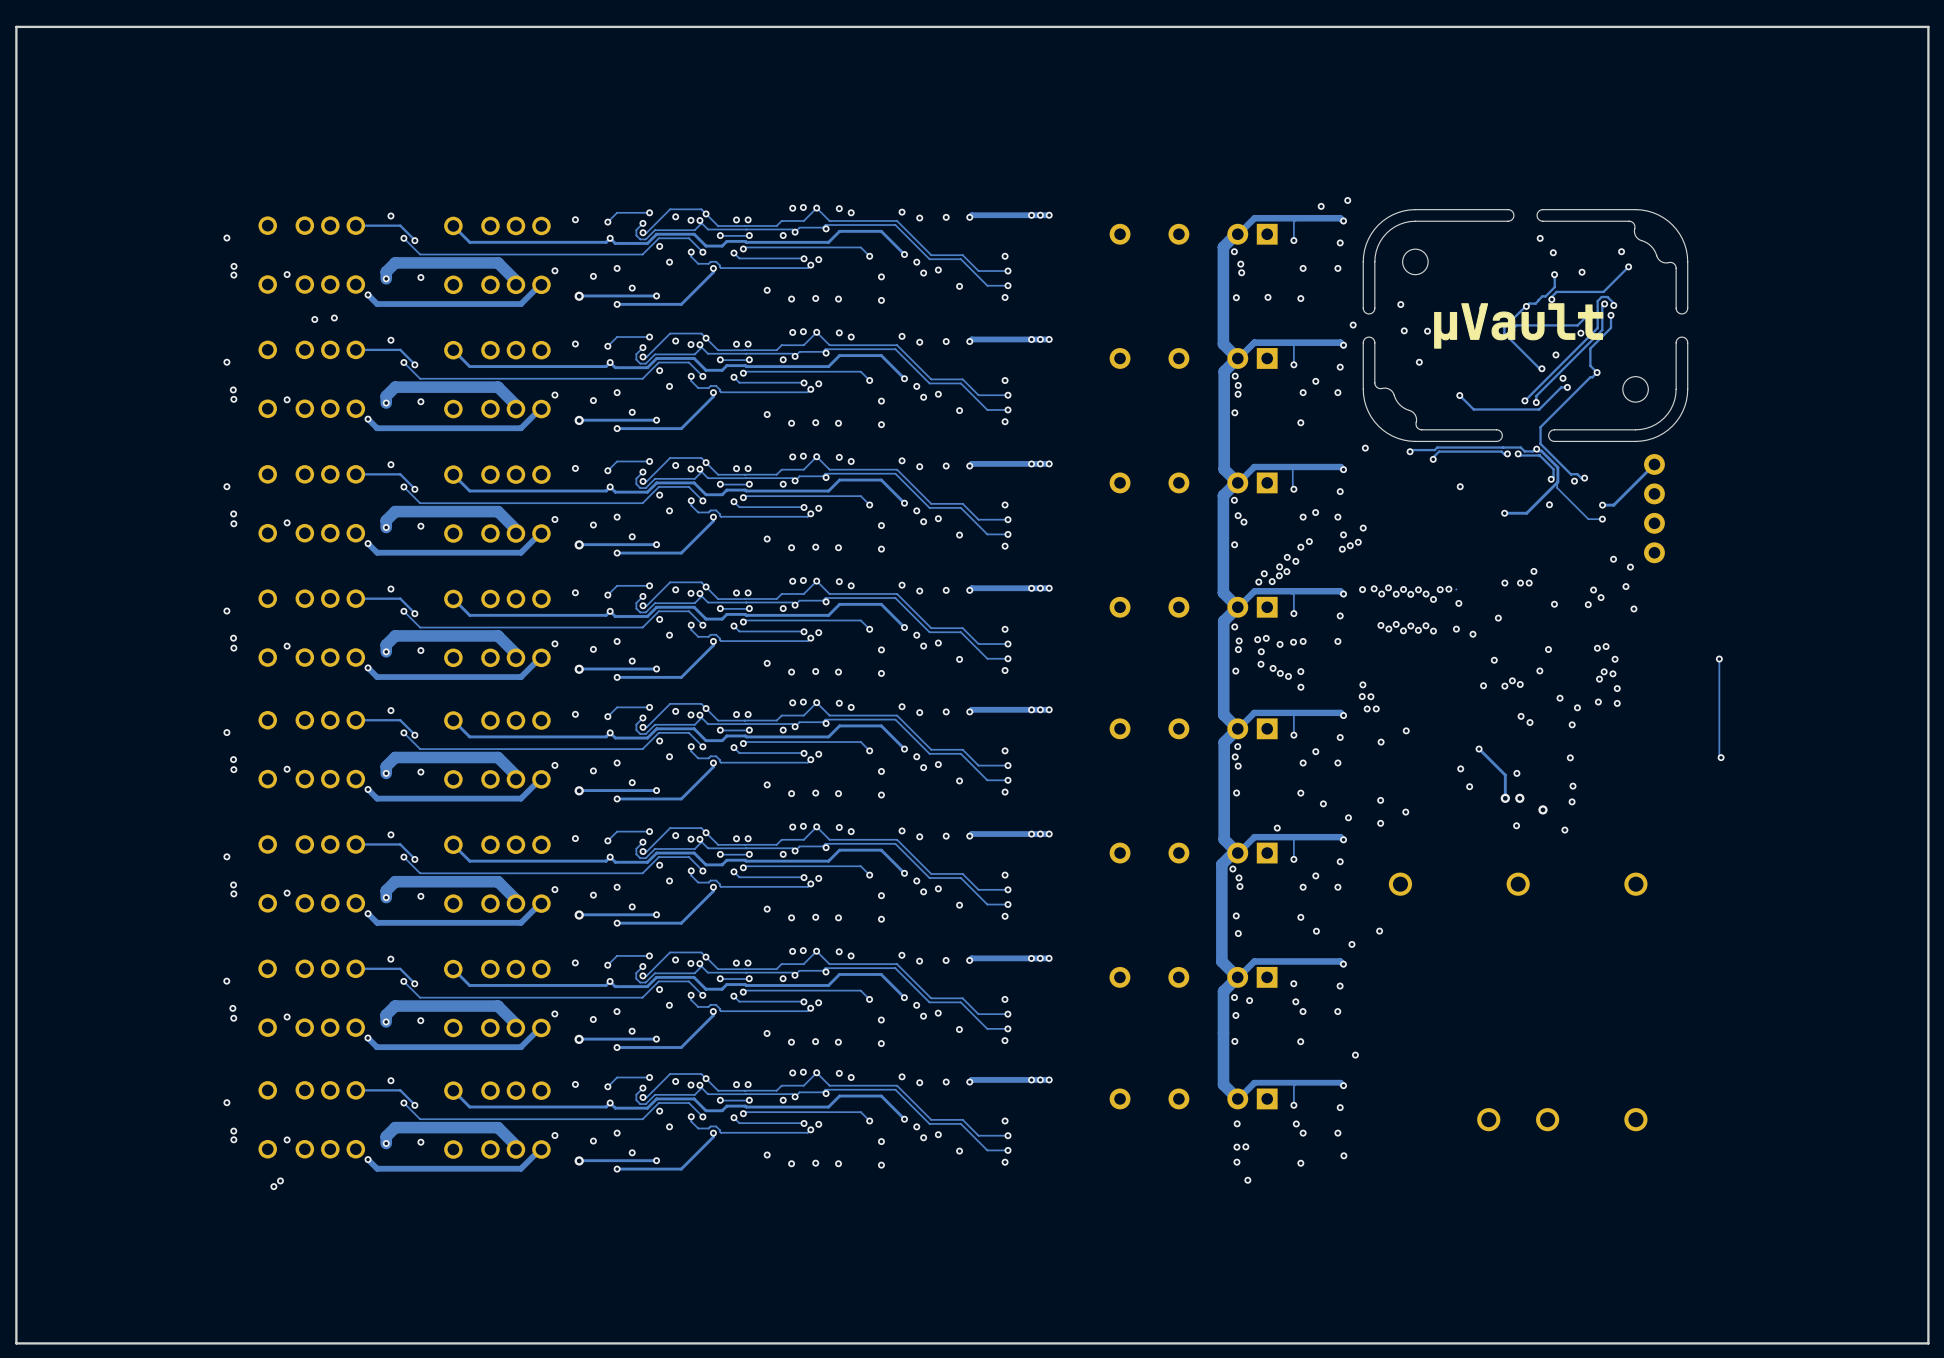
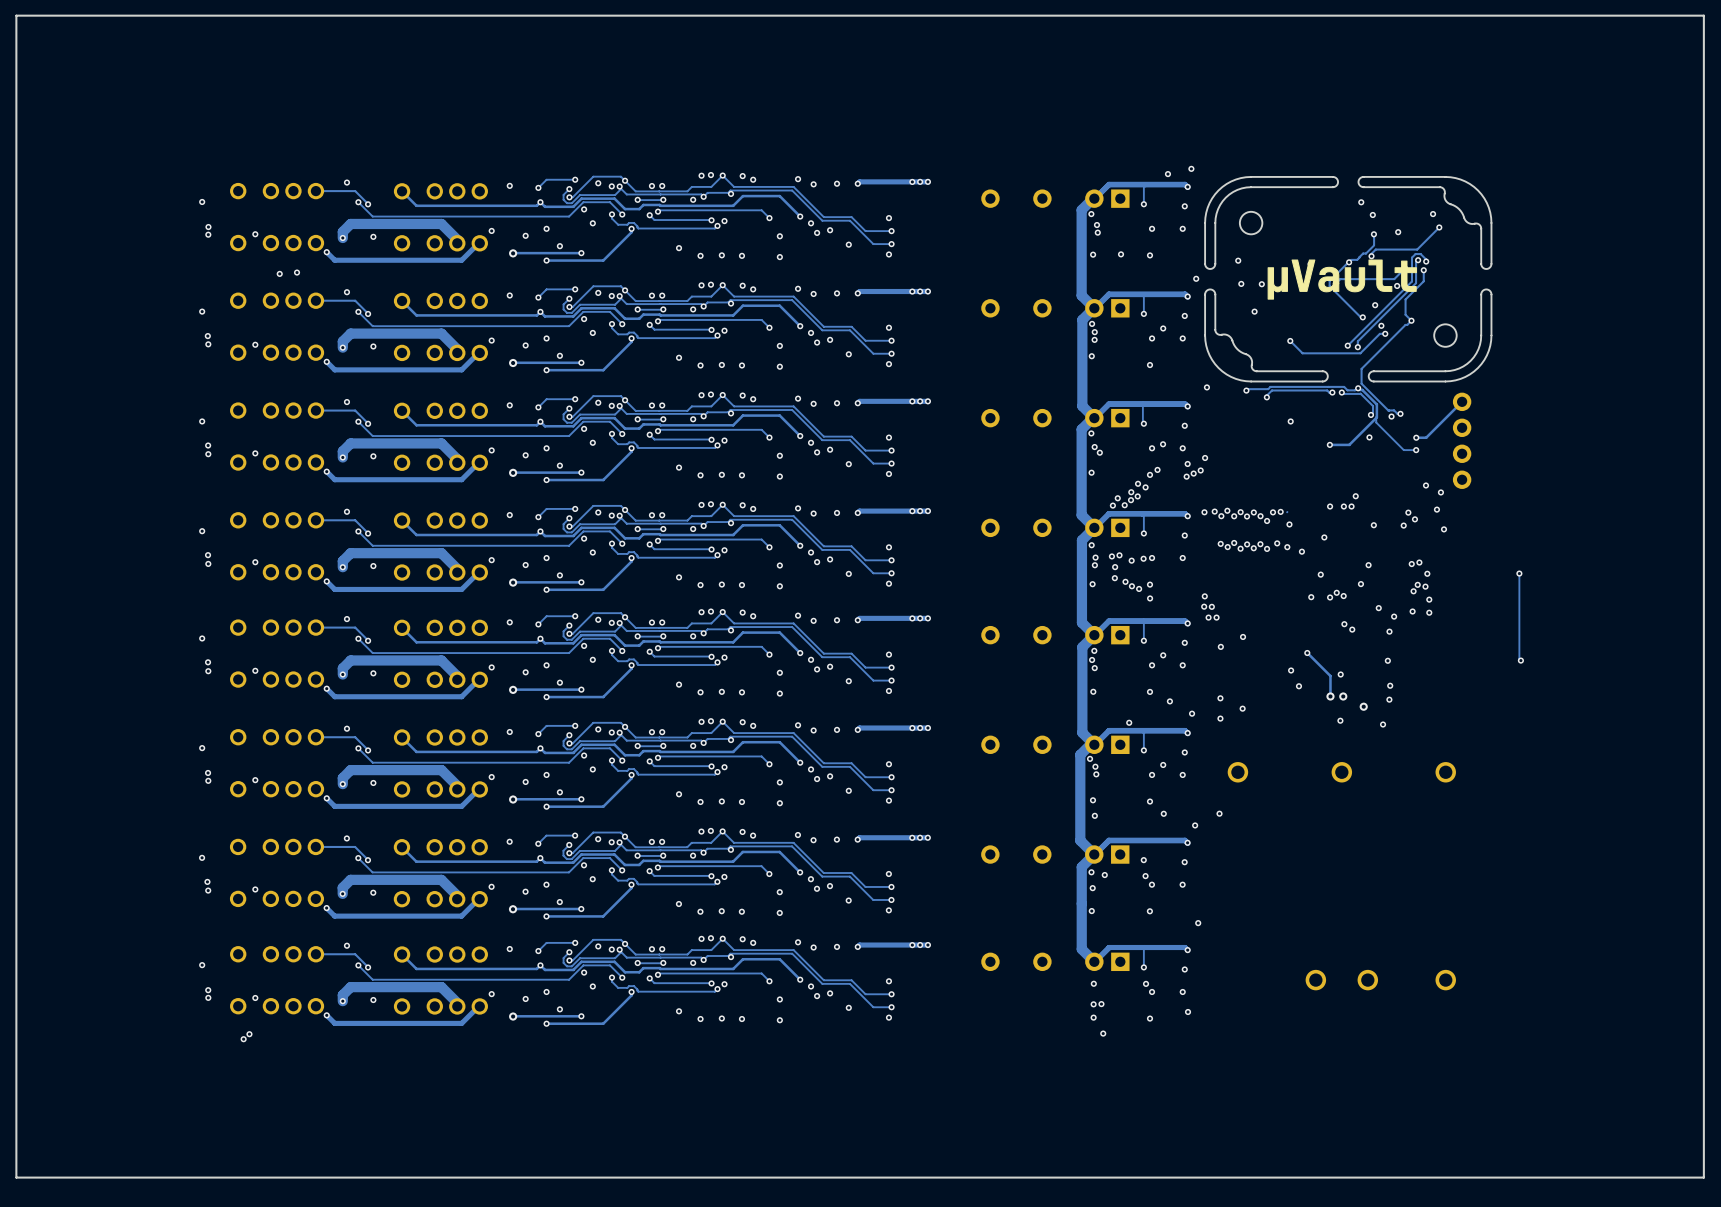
via: none -> (1277, 543)

